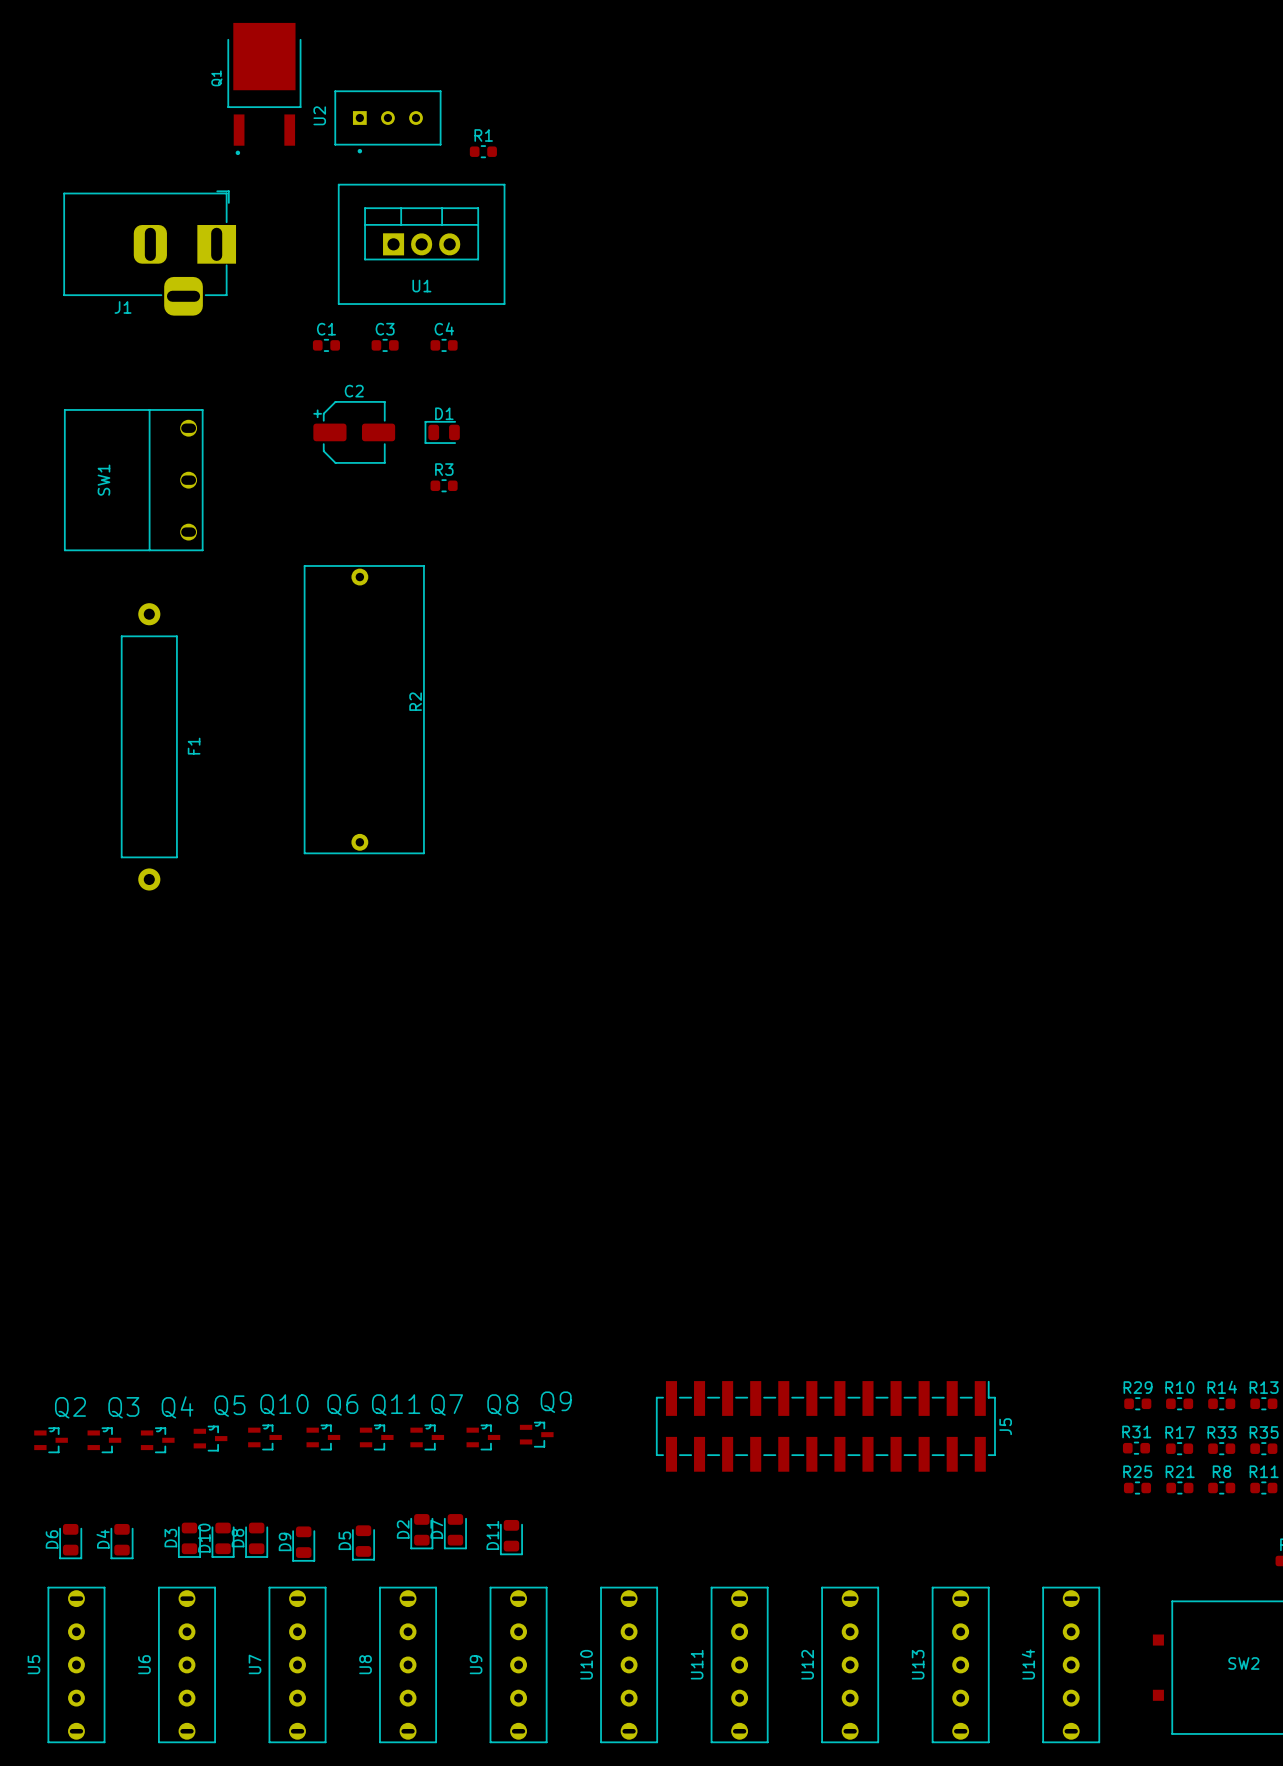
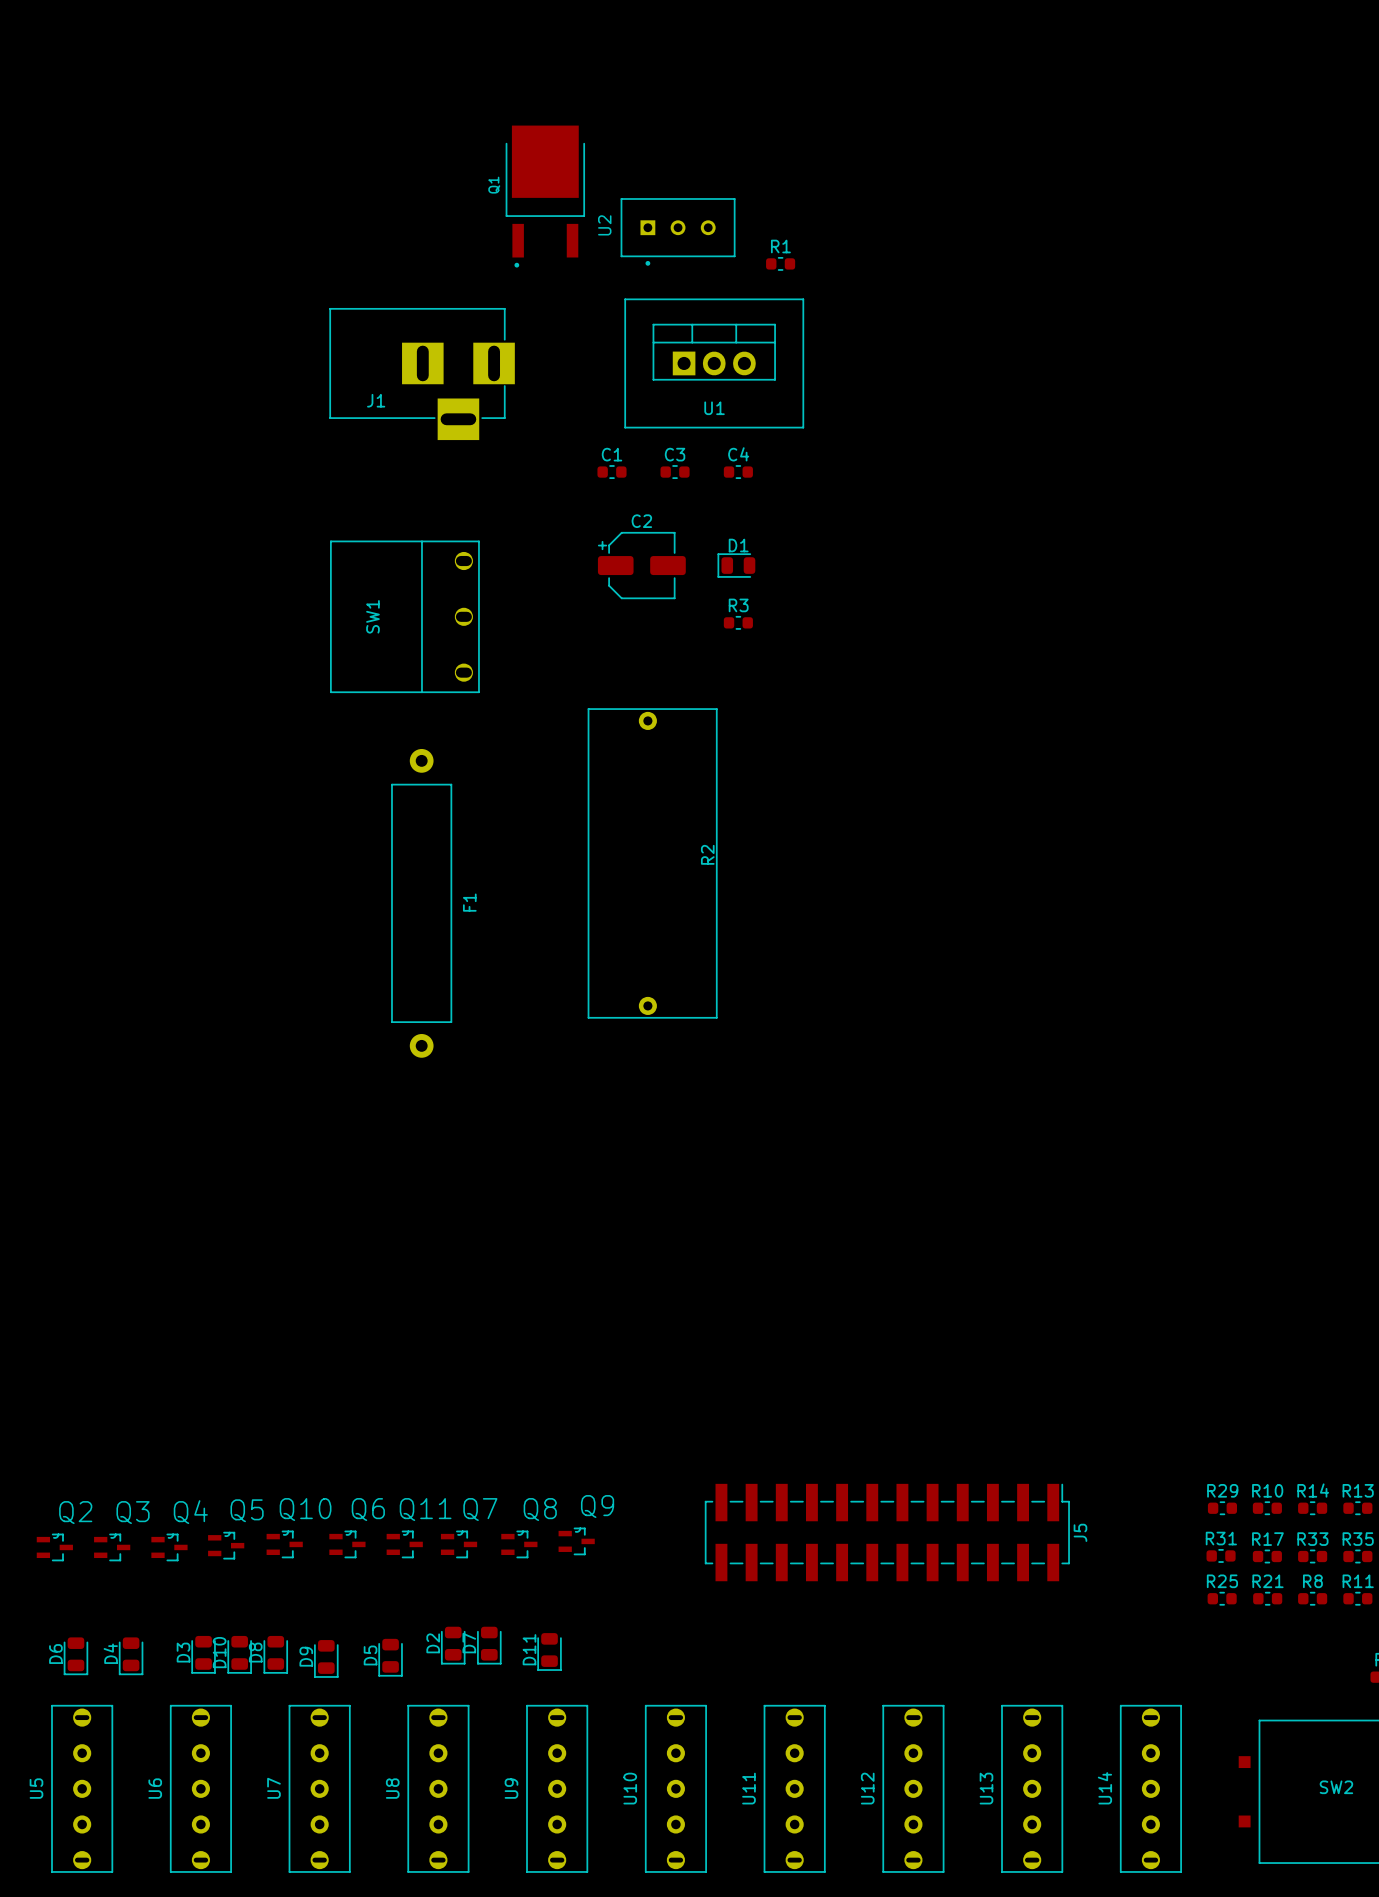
Q1 position: (264, 88) -> (545, 196)
U2 position: (387, 121) -> (678, 231)
R1 position: (483, 151) -> (780, 263)
J1 footprint: [63, 190, 237, 316] -> [329, 308, 515, 441]
U1 position: (421, 244) -> (714, 363)
J1 name position: J1 (123, 307) -> J1 (376, 400)
C1 position: (326, 345) -> (612, 472)
C3 position: (385, 345) -> (675, 472)
C4 position: (444, 345) -> (738, 472)
C2 position: (354, 432) -> (641, 565)
D1 position: (442, 432) -> (736, 565)
SW1 position: (133, 480) -> (404, 616)
R3 position: (444, 485) -> (738, 622)
R2 position: (364, 709) -> (652, 863)
F1 position: (149, 746) -> (421, 903)

